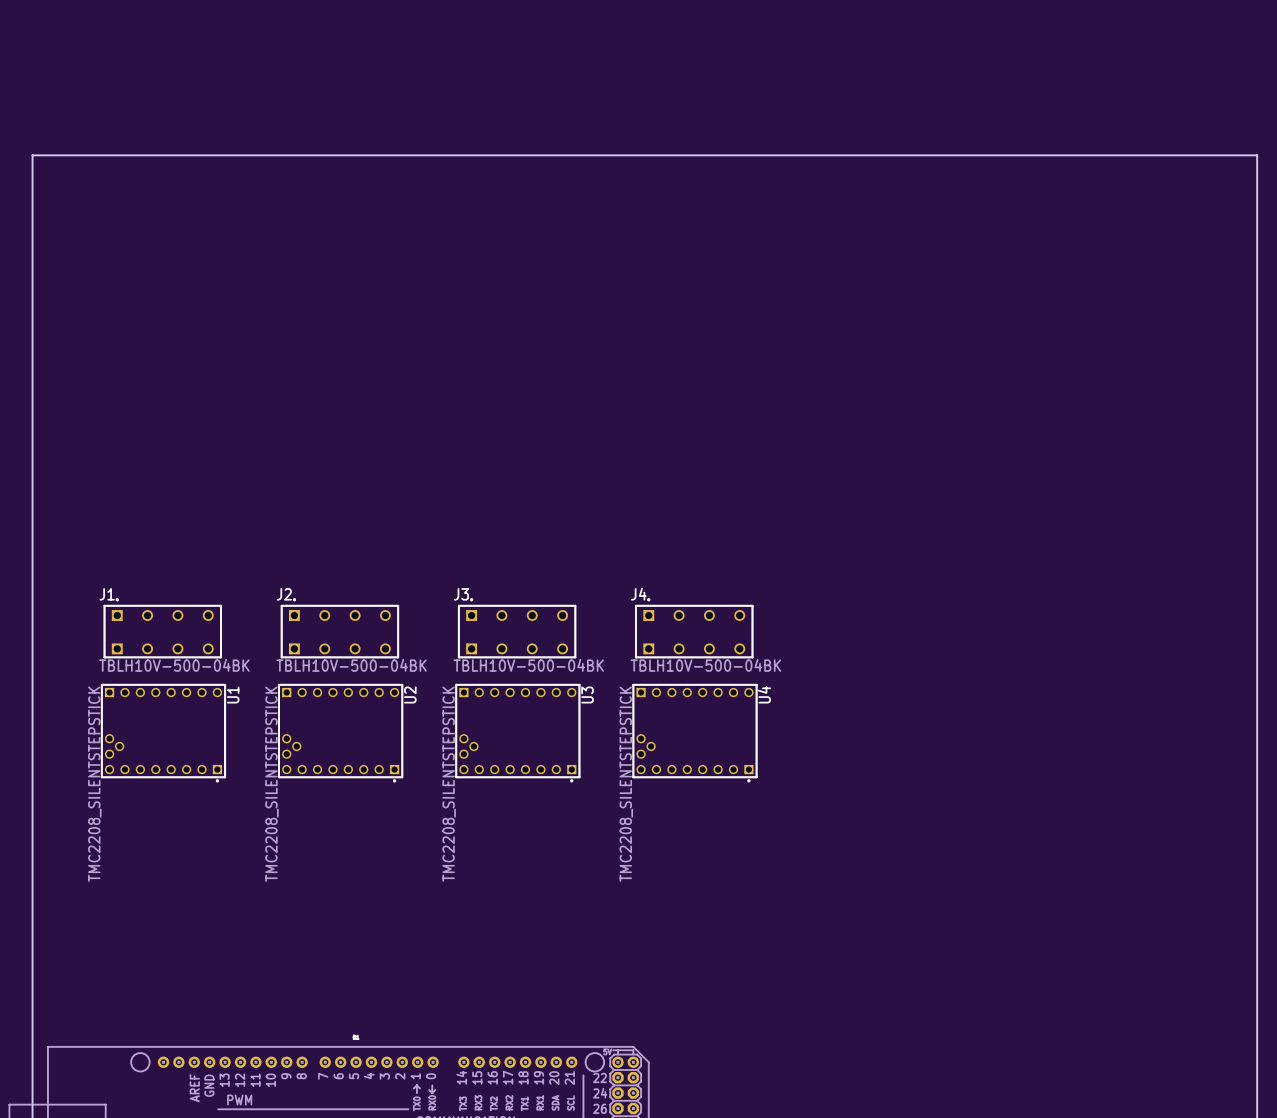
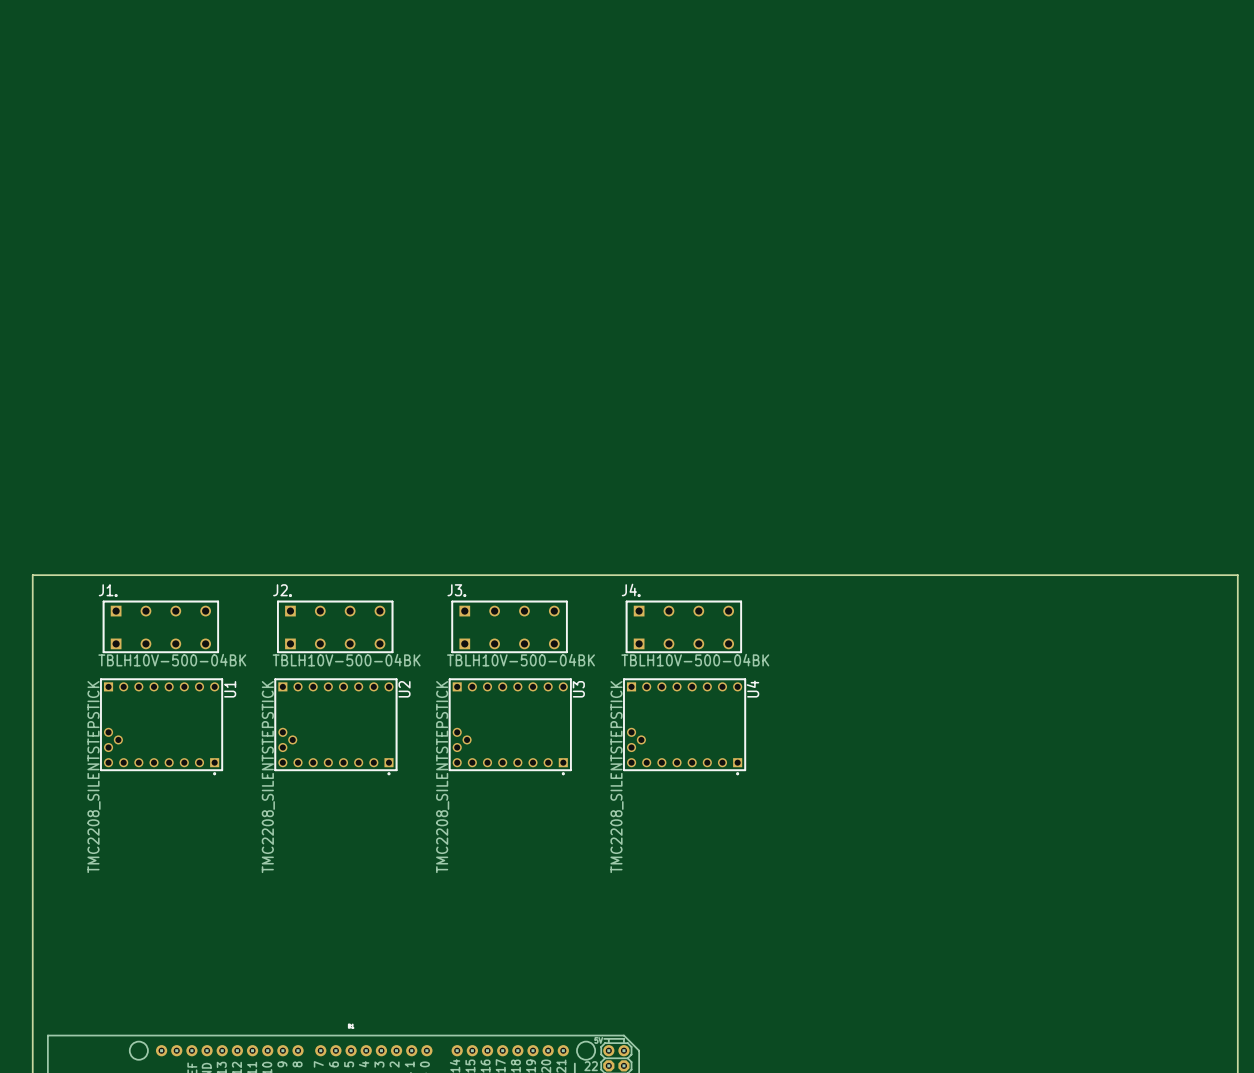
board edge: (32, 578) (32, 155) (1257, 155) (1257, 578) -> (32, 575) (1237, 575)

